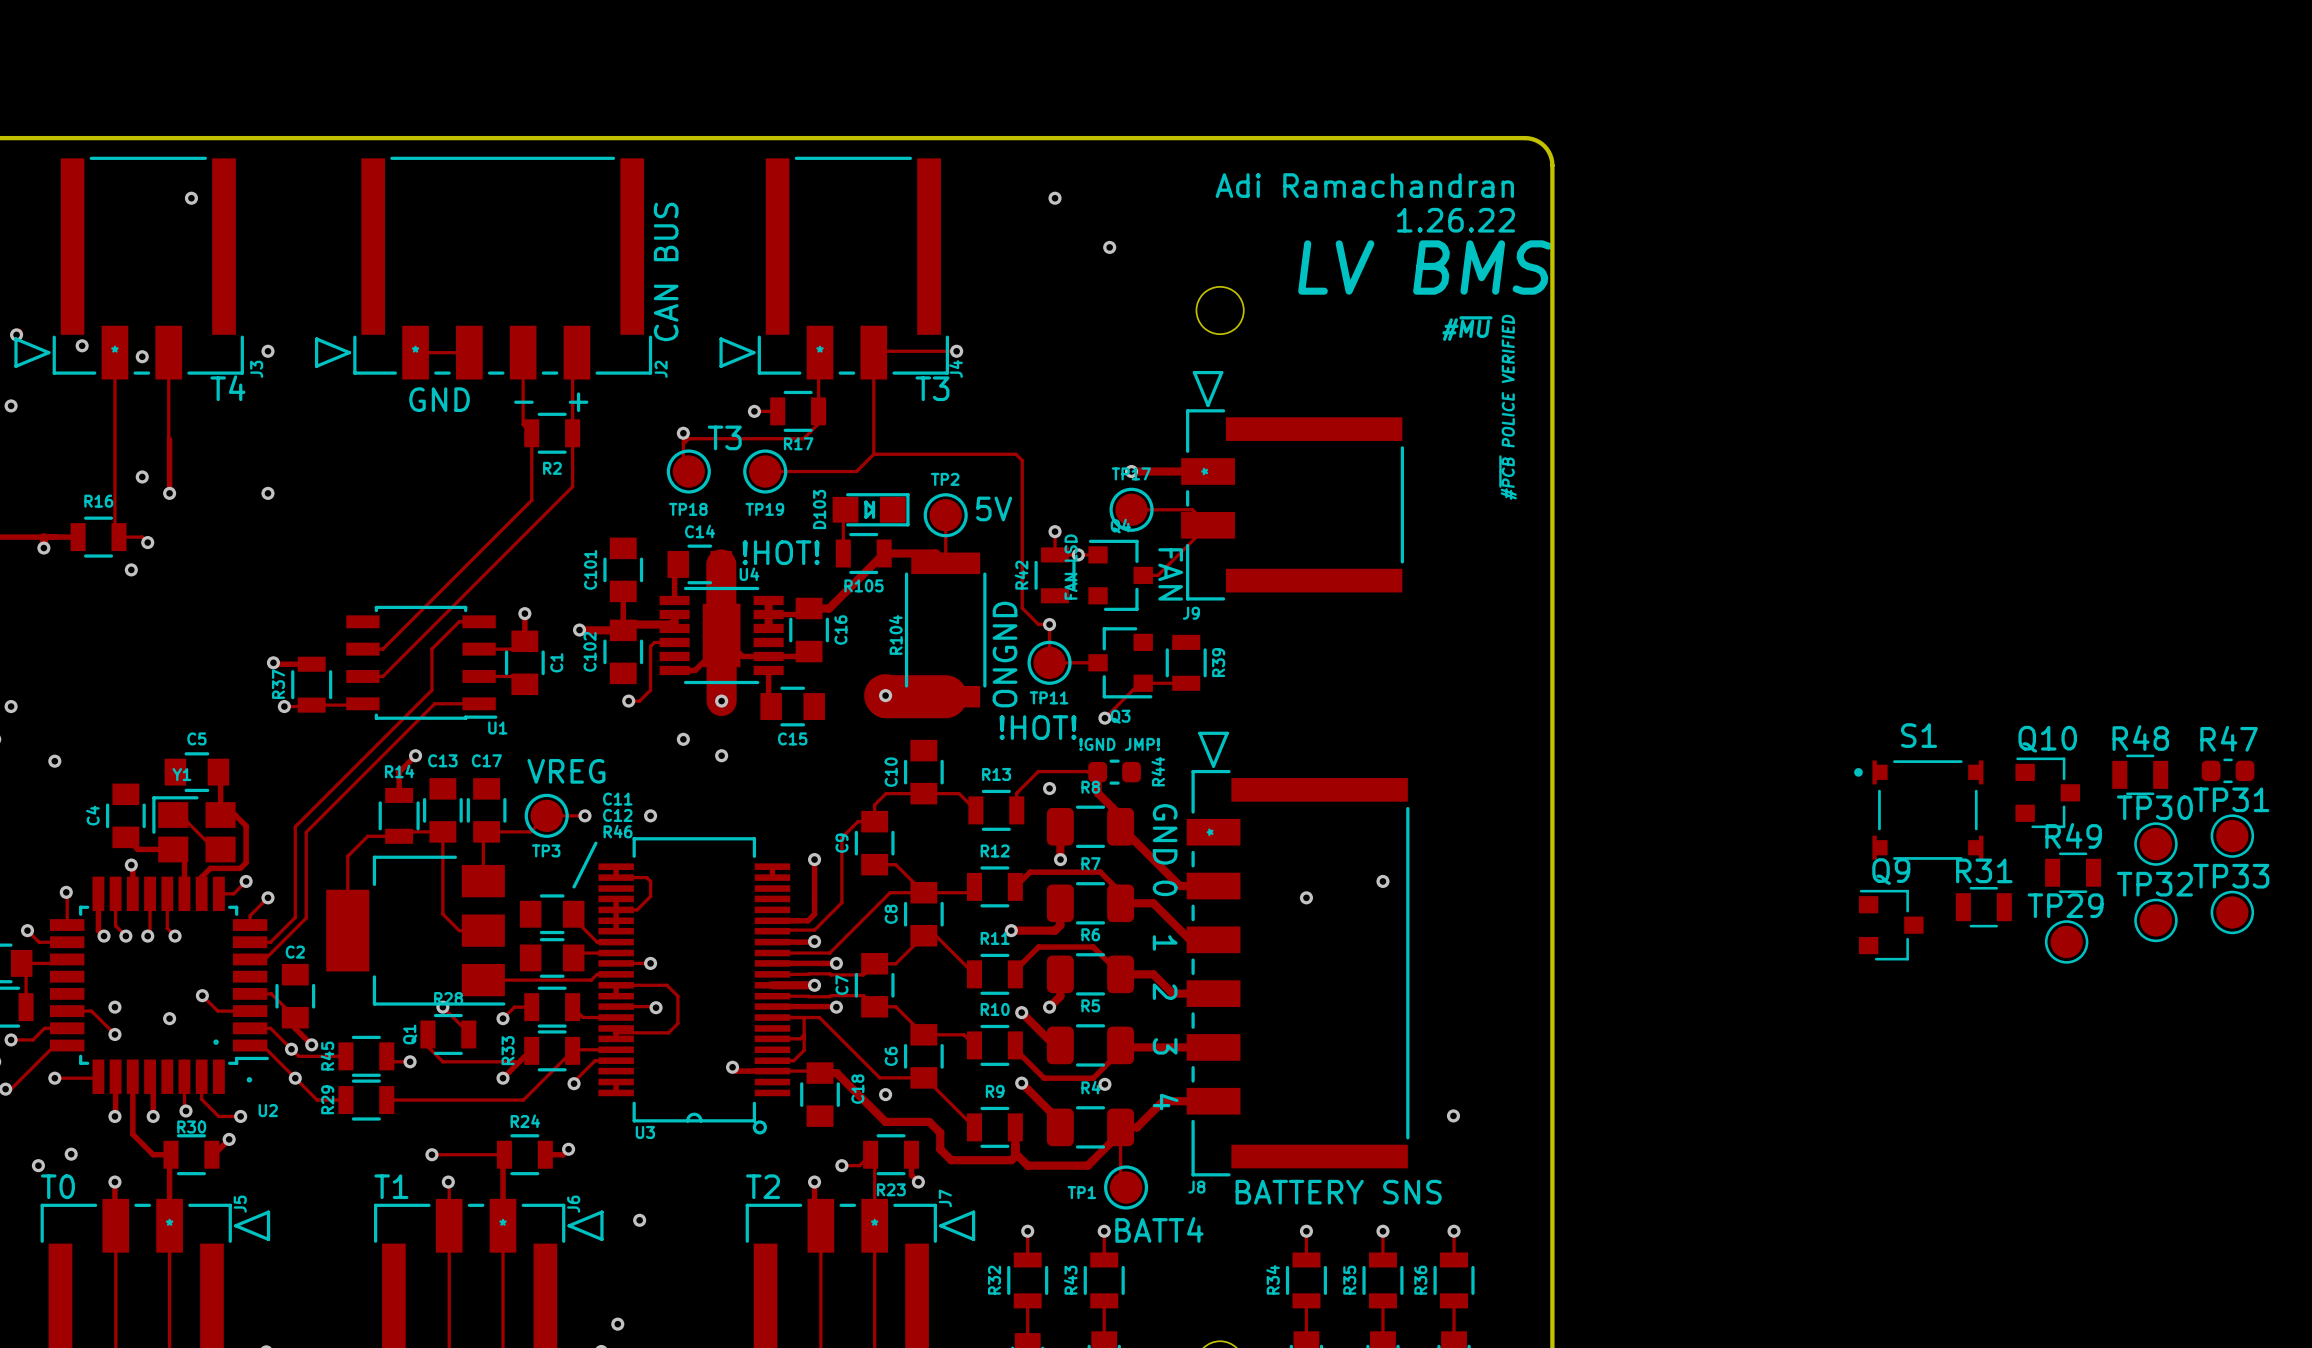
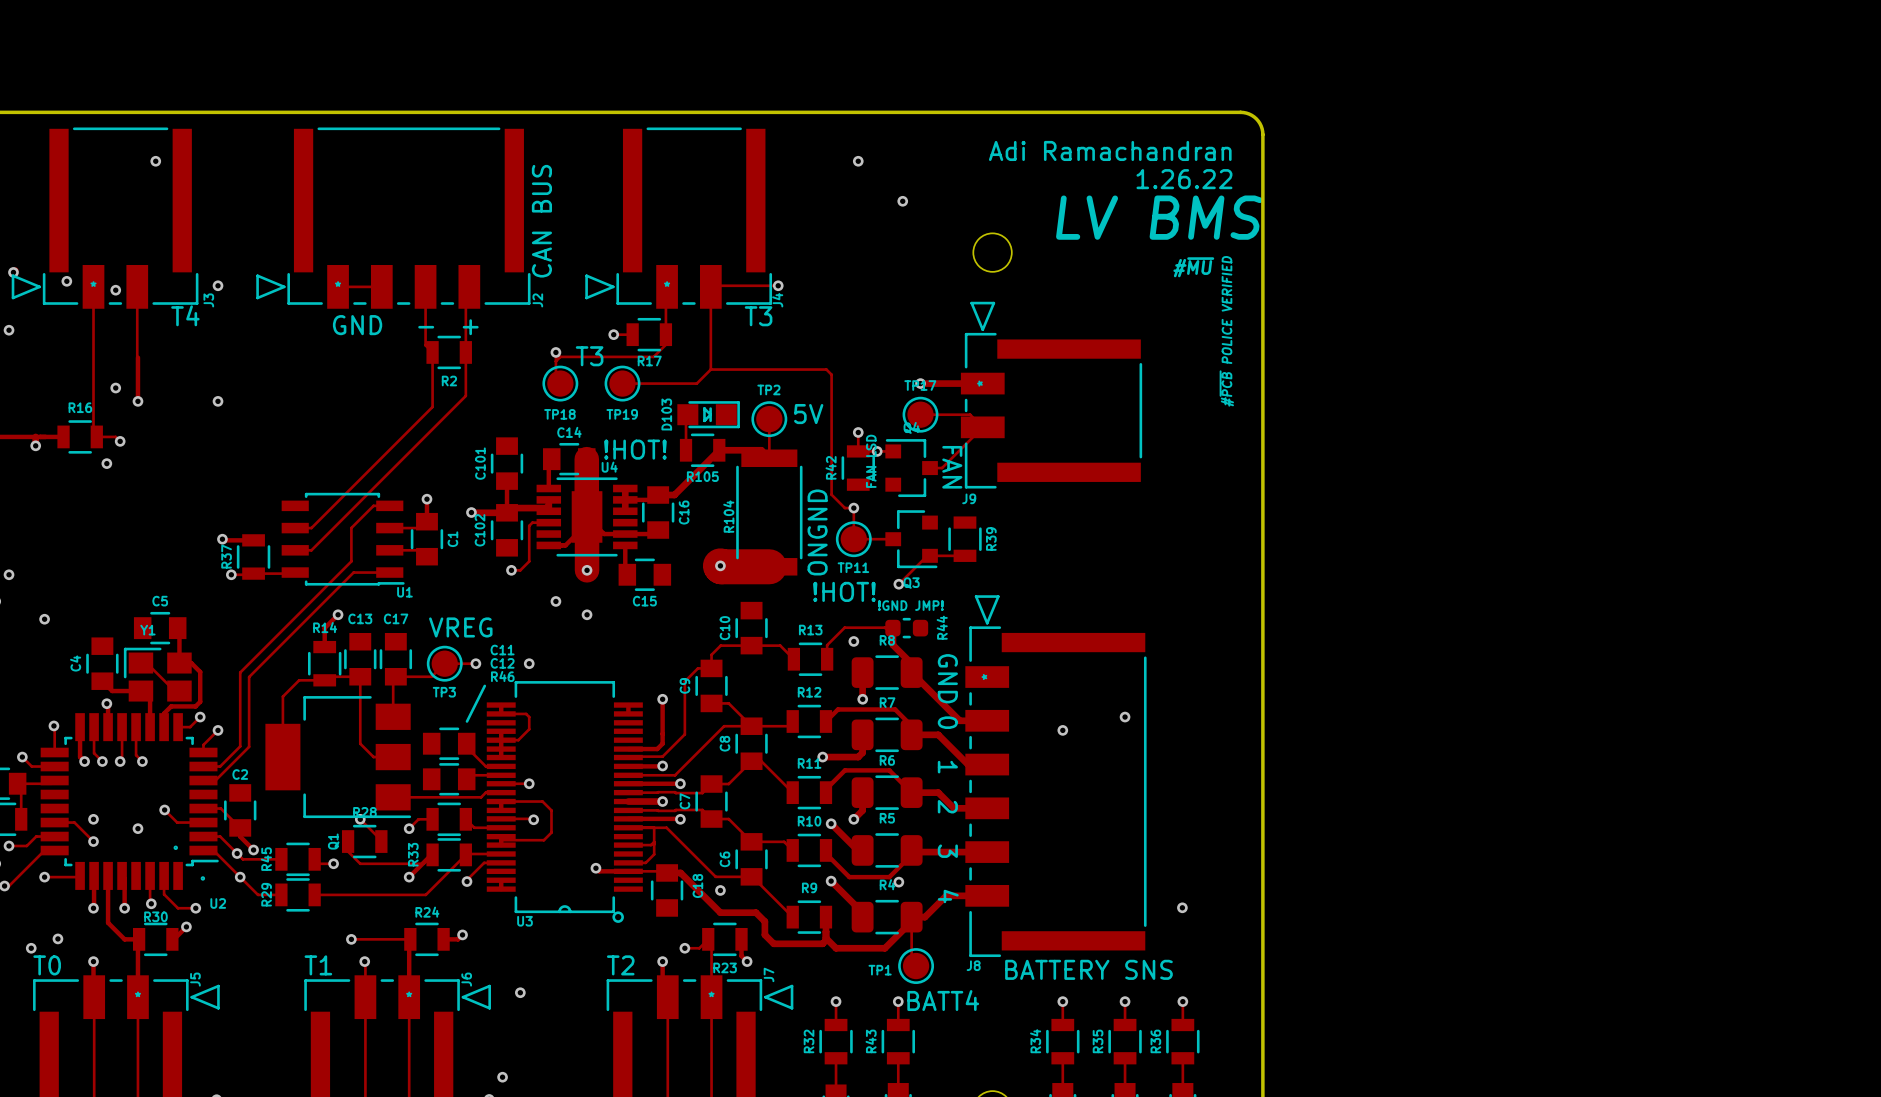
R47: (2228, 770) -> none
R48: (2140, 774) -> none
Q10: (2047, 792) -> none
S1: (1918, 810) -> none
TP31: (2232, 836) -> none
TP30: (2155, 844) -> none
R49: (2073, 872) -> none
R31: (1983, 907) -> none
TP33: (2232, 912) -> none
TP32: (2155, 920) -> none
Q9: (1891, 925) -> none
TP29: (2066, 941) -> none

